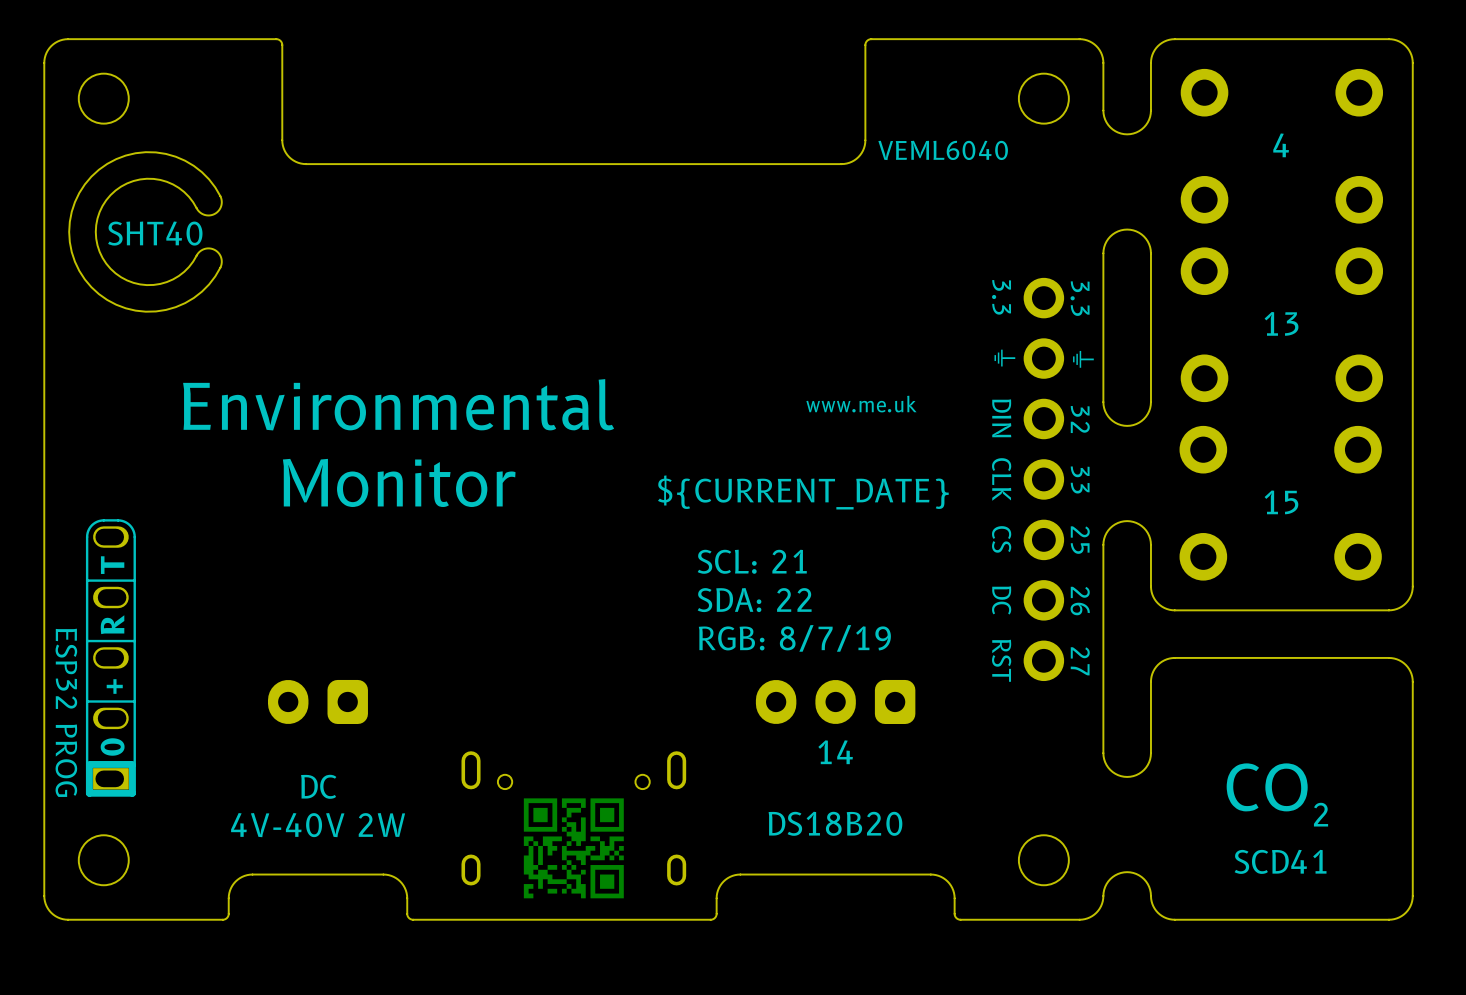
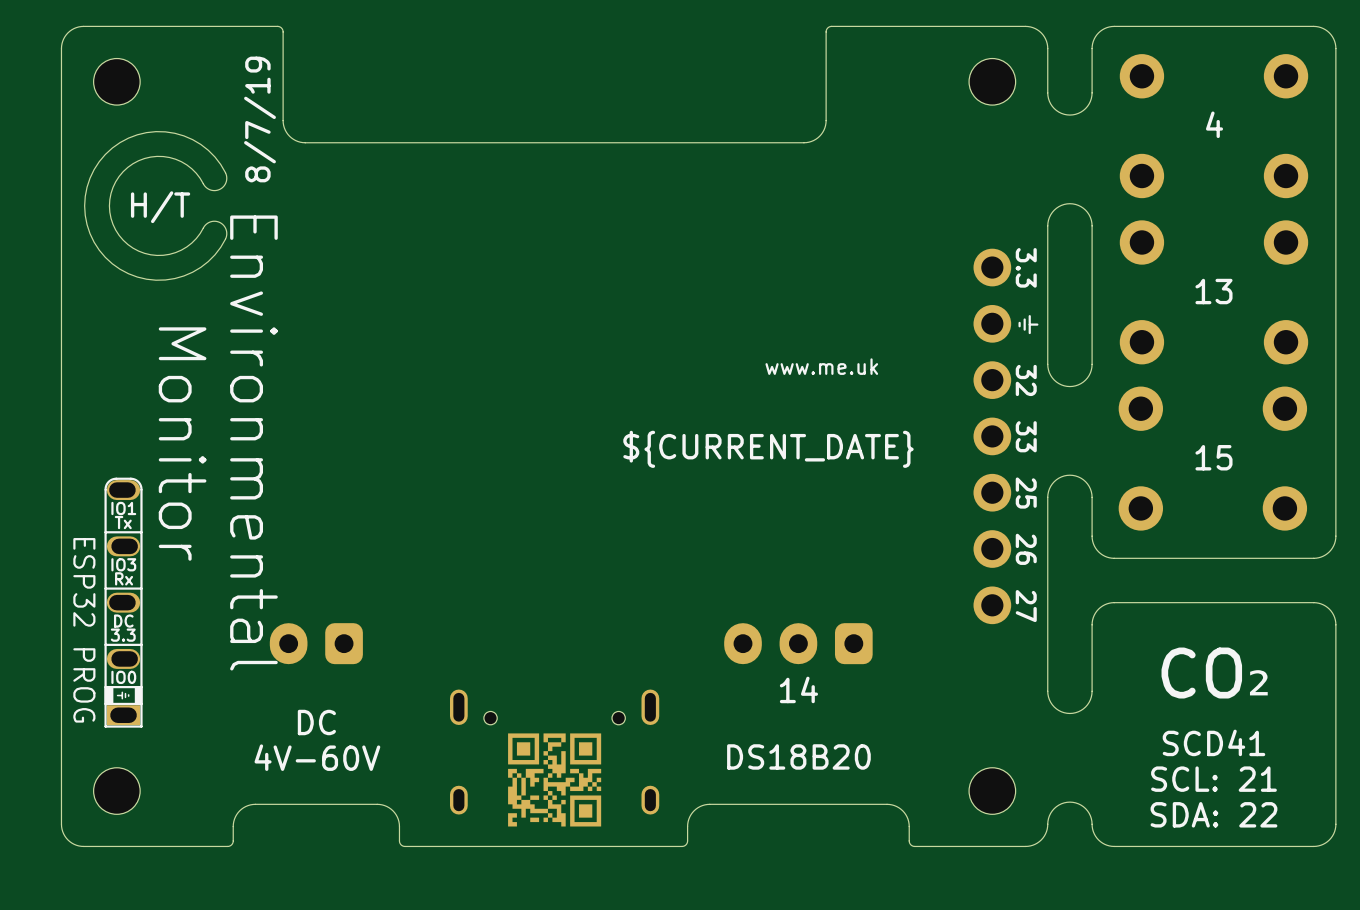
text: none -> 8/7/19 (260, 119)
text: VEML6040 (943, 150) -> none
text: SHT40 (155, 233) -> H/T (160, 207)
text: 3.3 (1001, 297) -> none
text: ⏚ (1004, 358) -> none
text rotation: 0° (398, 404) -> 90° clockwise (253, 442)
text: DIN (1001, 418) -> none
text: CLK (1001, 479) -> none
text rotation: 0° (399, 482) -> 90° clockwise (182, 444)
part footprint: [85, 519, 136, 797] -> [104, 477, 143, 728]
text: CS (1001, 539) -> none
text: SCL: 21 (752, 561) -> none
text: SDA: 22 (754, 600) -> none
text: DC (1001, 600) -> none
text: RGB: 8/7/19 (794, 638) -> none
text: RST (1001, 660) -> none
text position: CO₂ (1277, 794) -> CO₂ (1216, 673)
text: 4V-40V 2W (318, 825) -> 4V-60V (317, 757)
text: none -> SCL: 21 (1213, 779)
text position: SCD41 (1280, 861) -> SCD41 (1213, 742)
text: none -> SDA: 22 (1213, 814)

